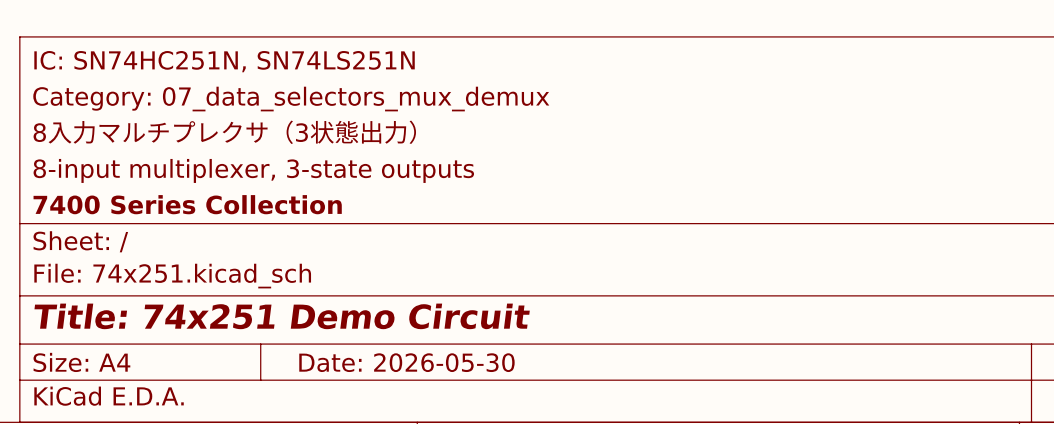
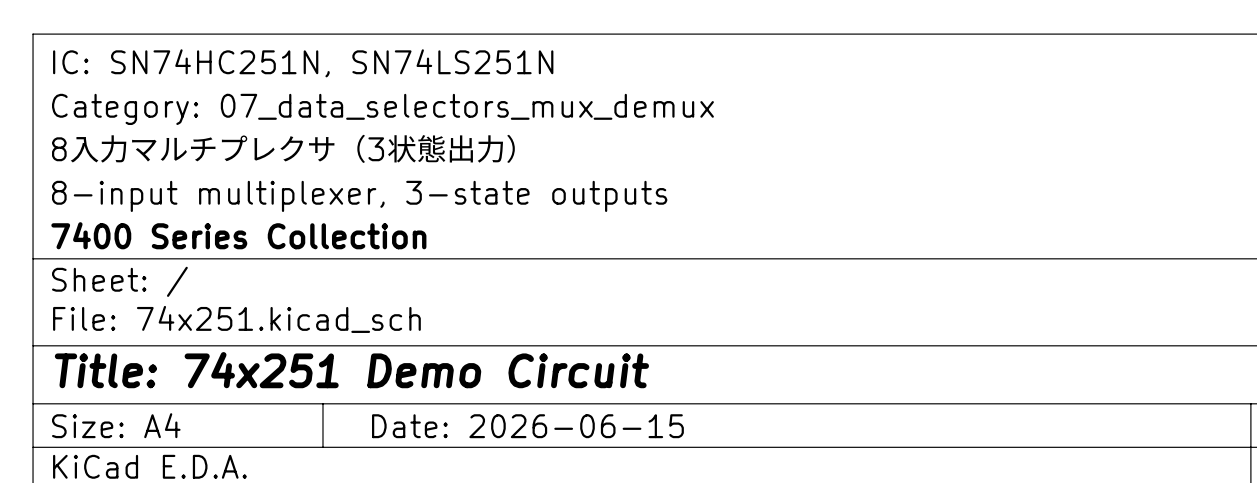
title block: Date: 2026-05-30 (406, 362) -> Date: 2026-06-15 (527, 426)

